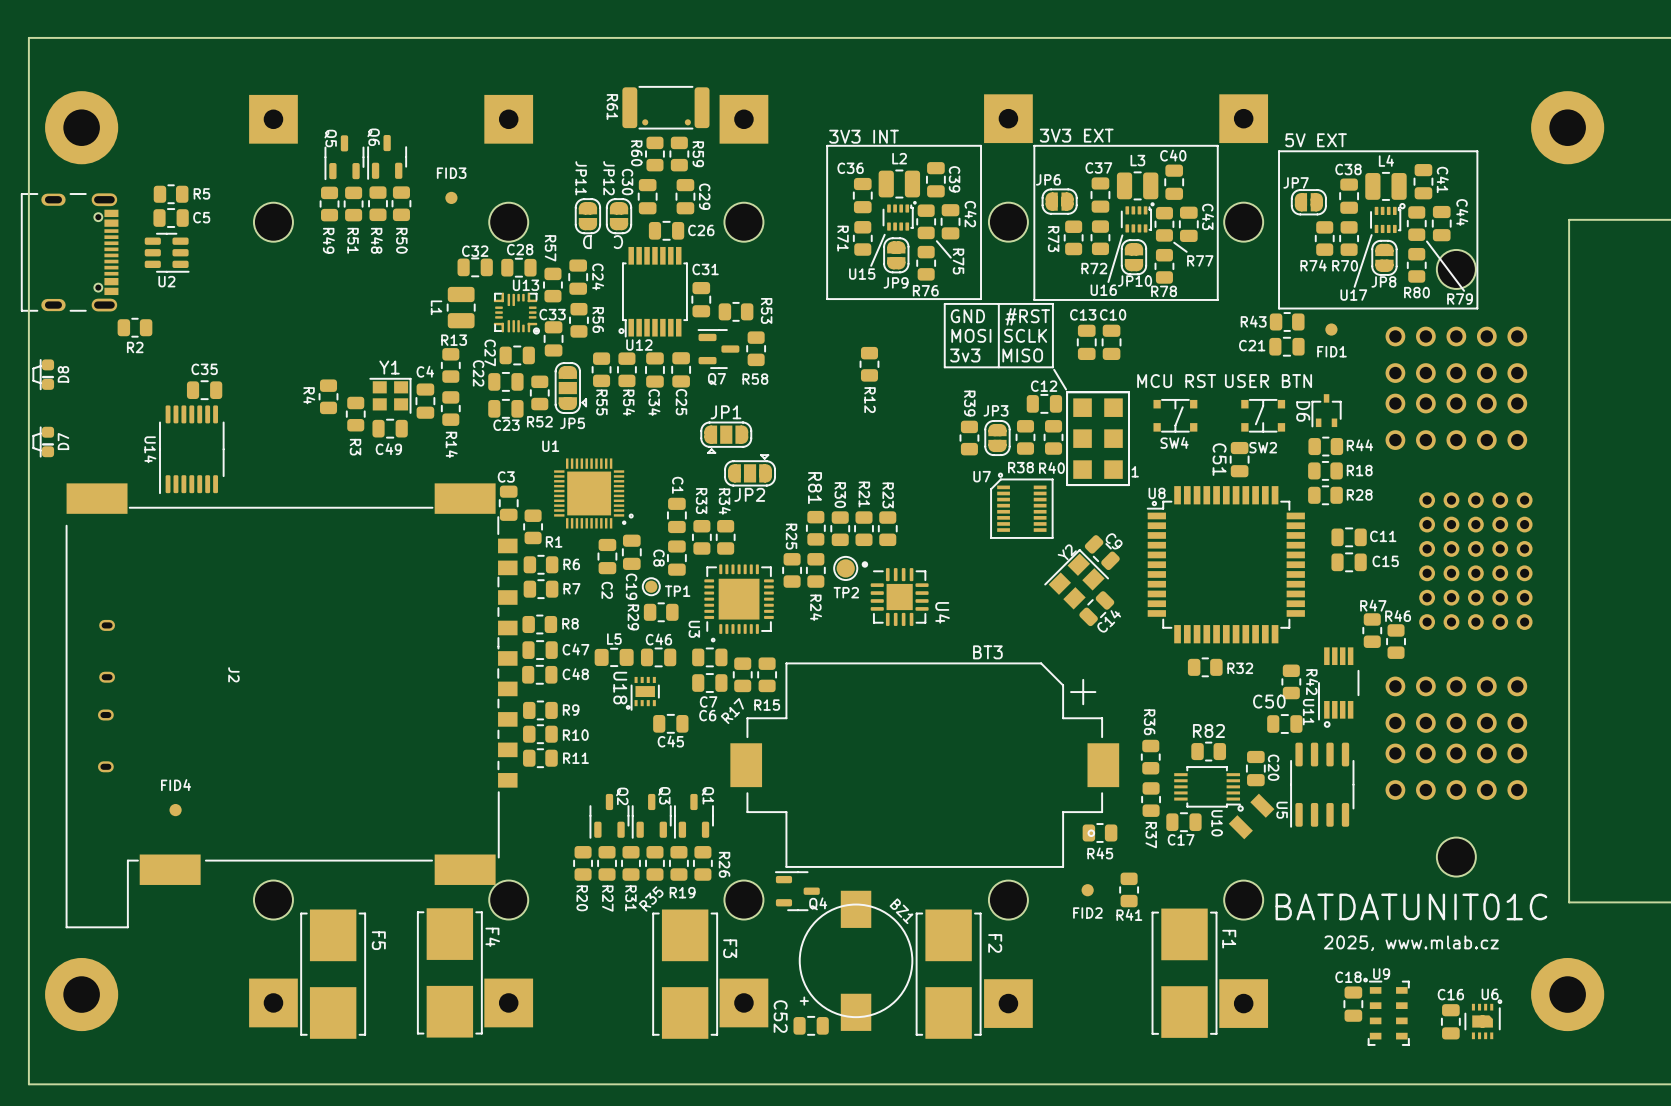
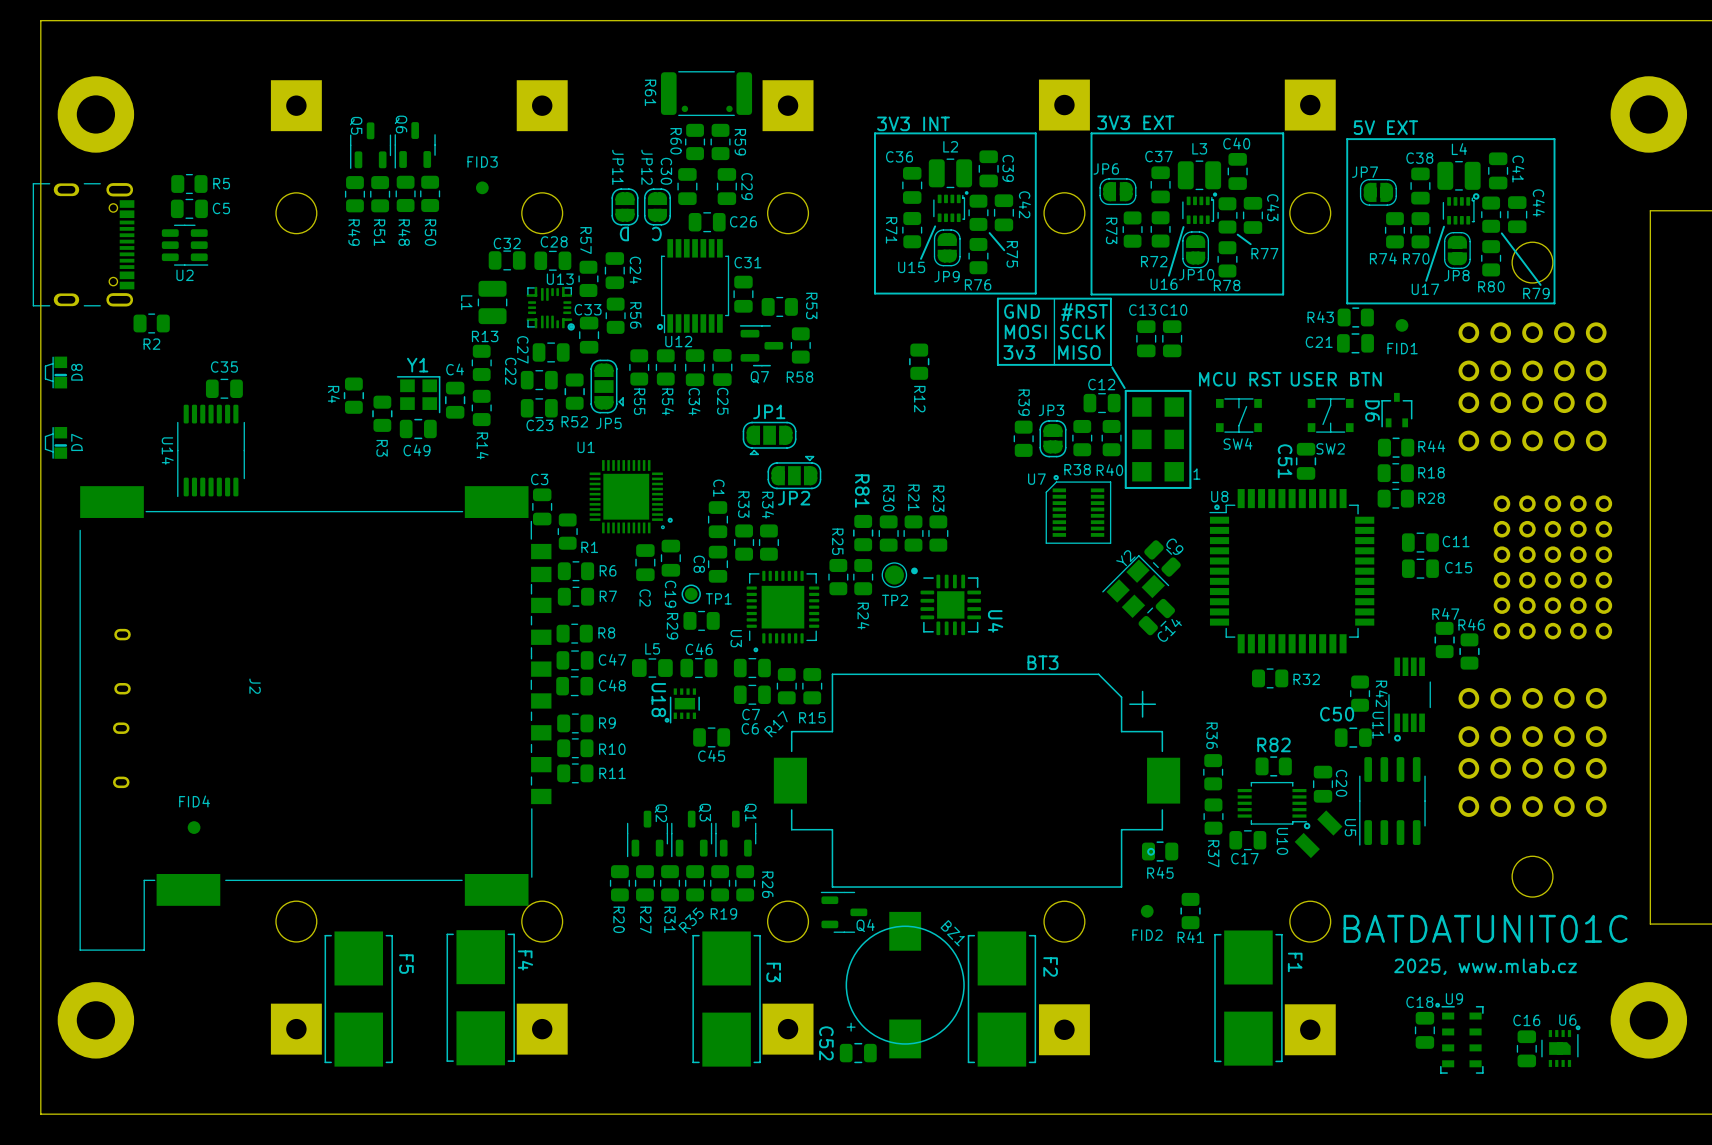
D8 footprint: [32, 359, 55, 390] -> [44, 356, 68, 389]
D7 footprint: [32, 426, 55, 458] -> [44, 426, 68, 459]

